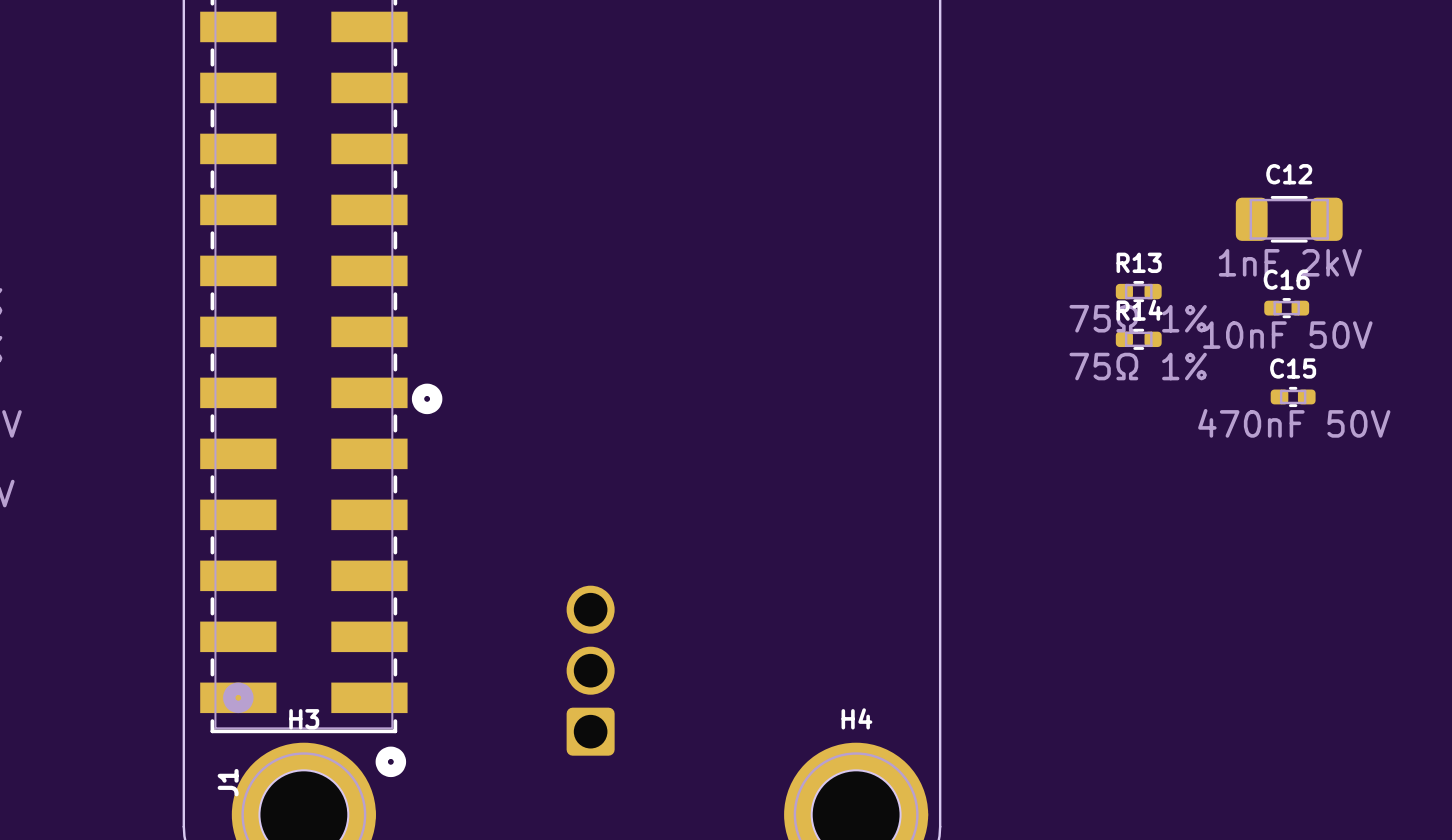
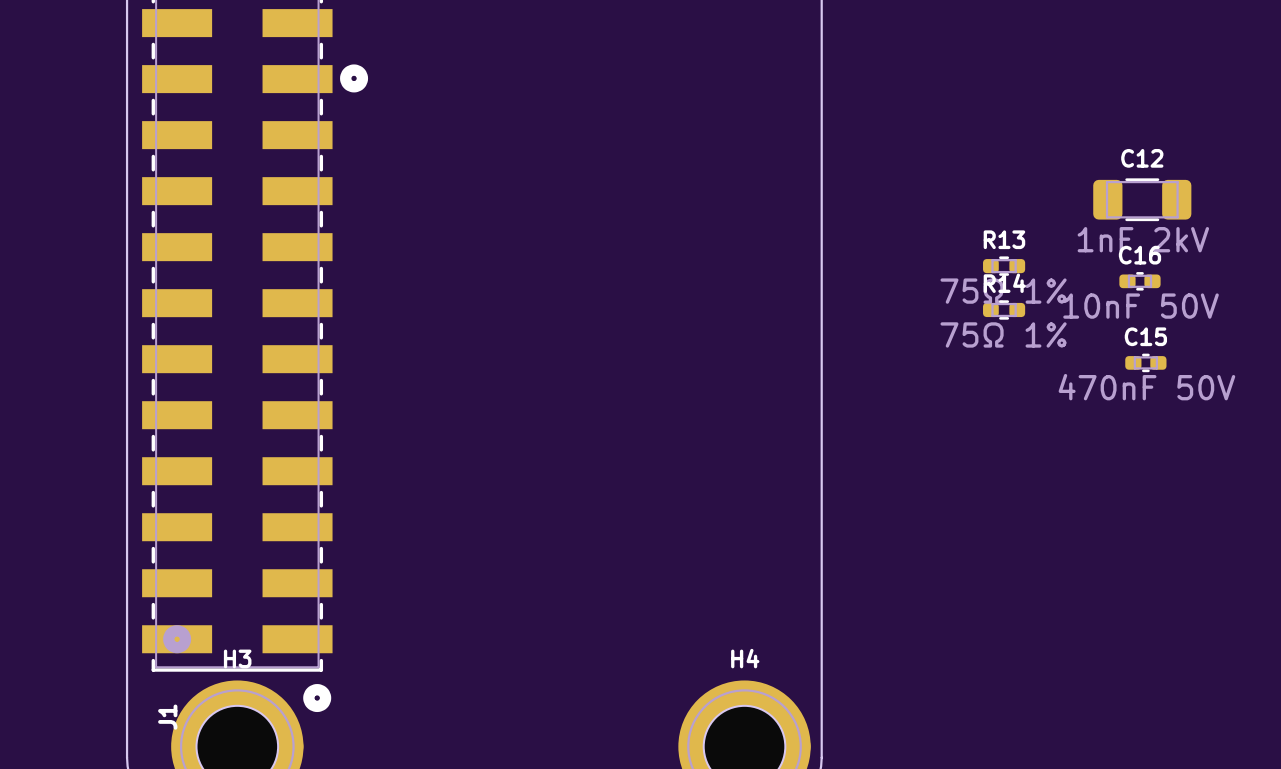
part position: (427, 398) -> (354, 78)
part: (590, 670) -> none

